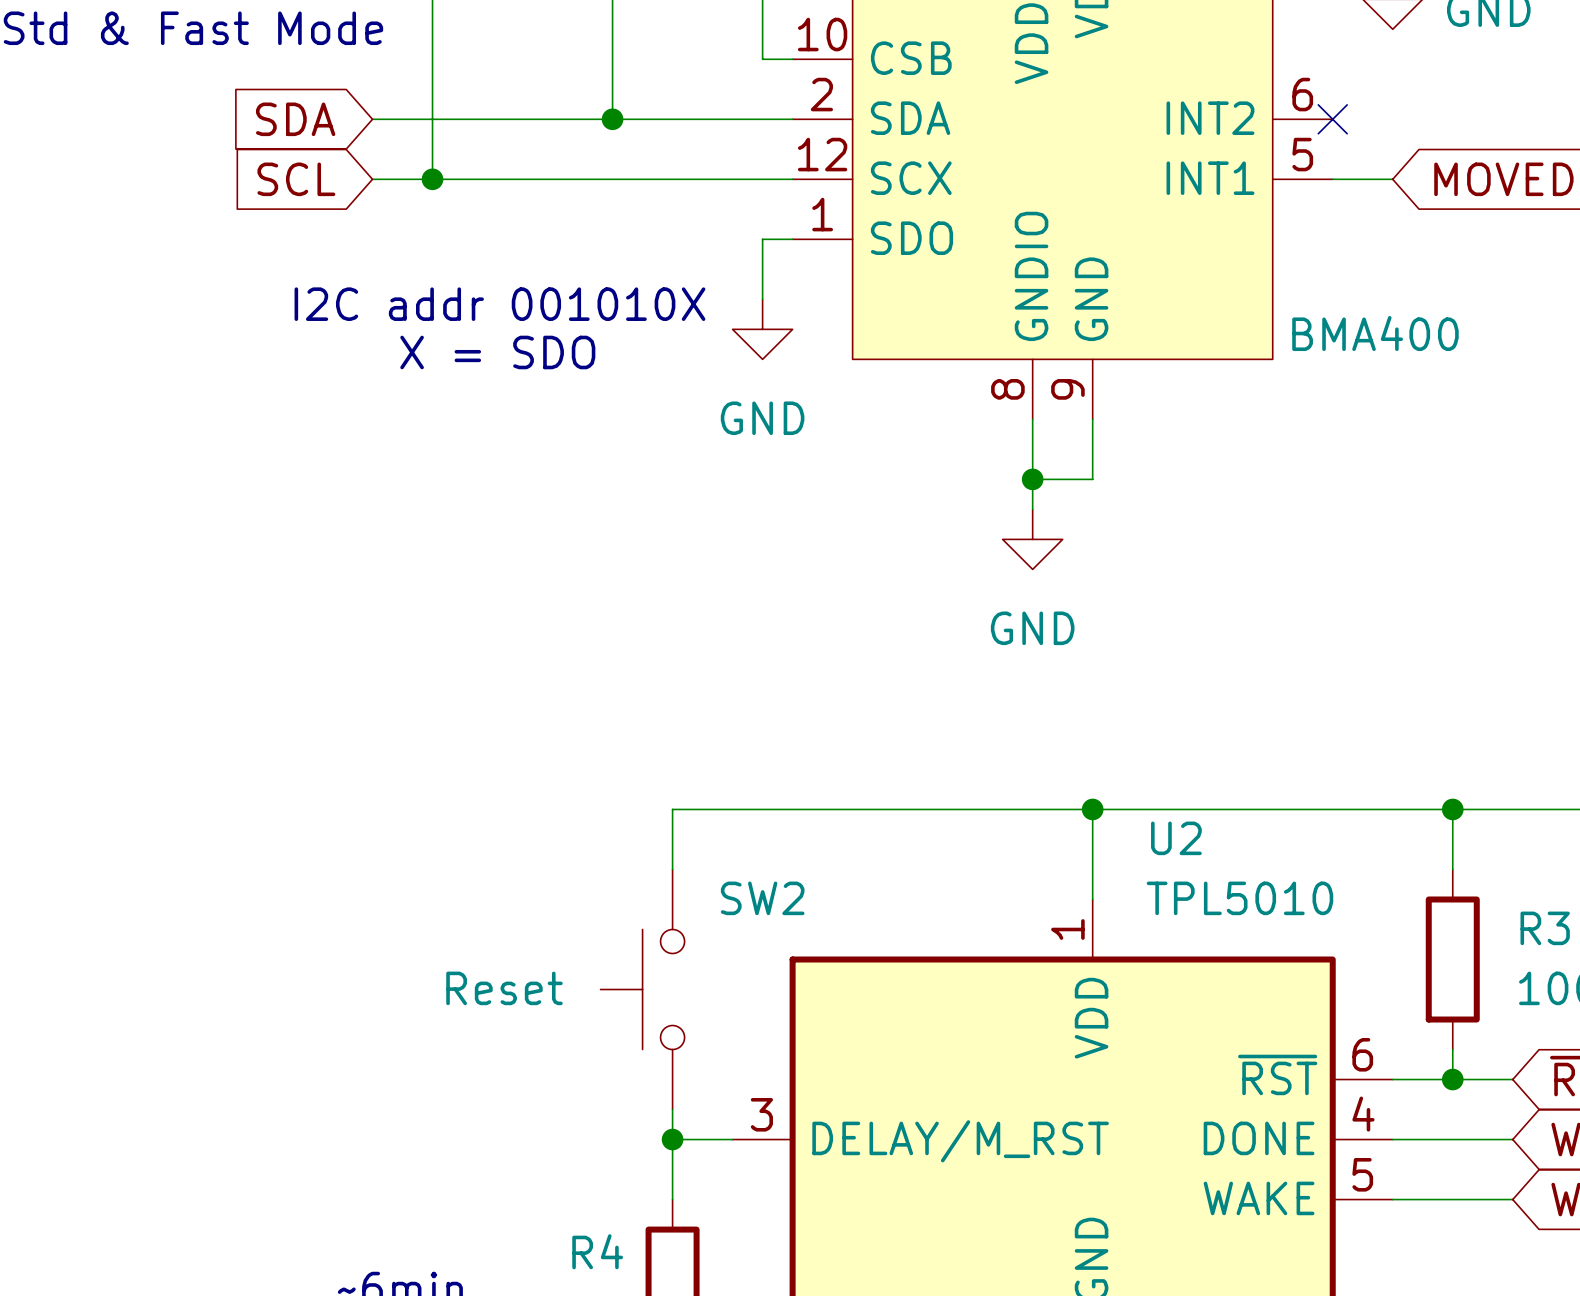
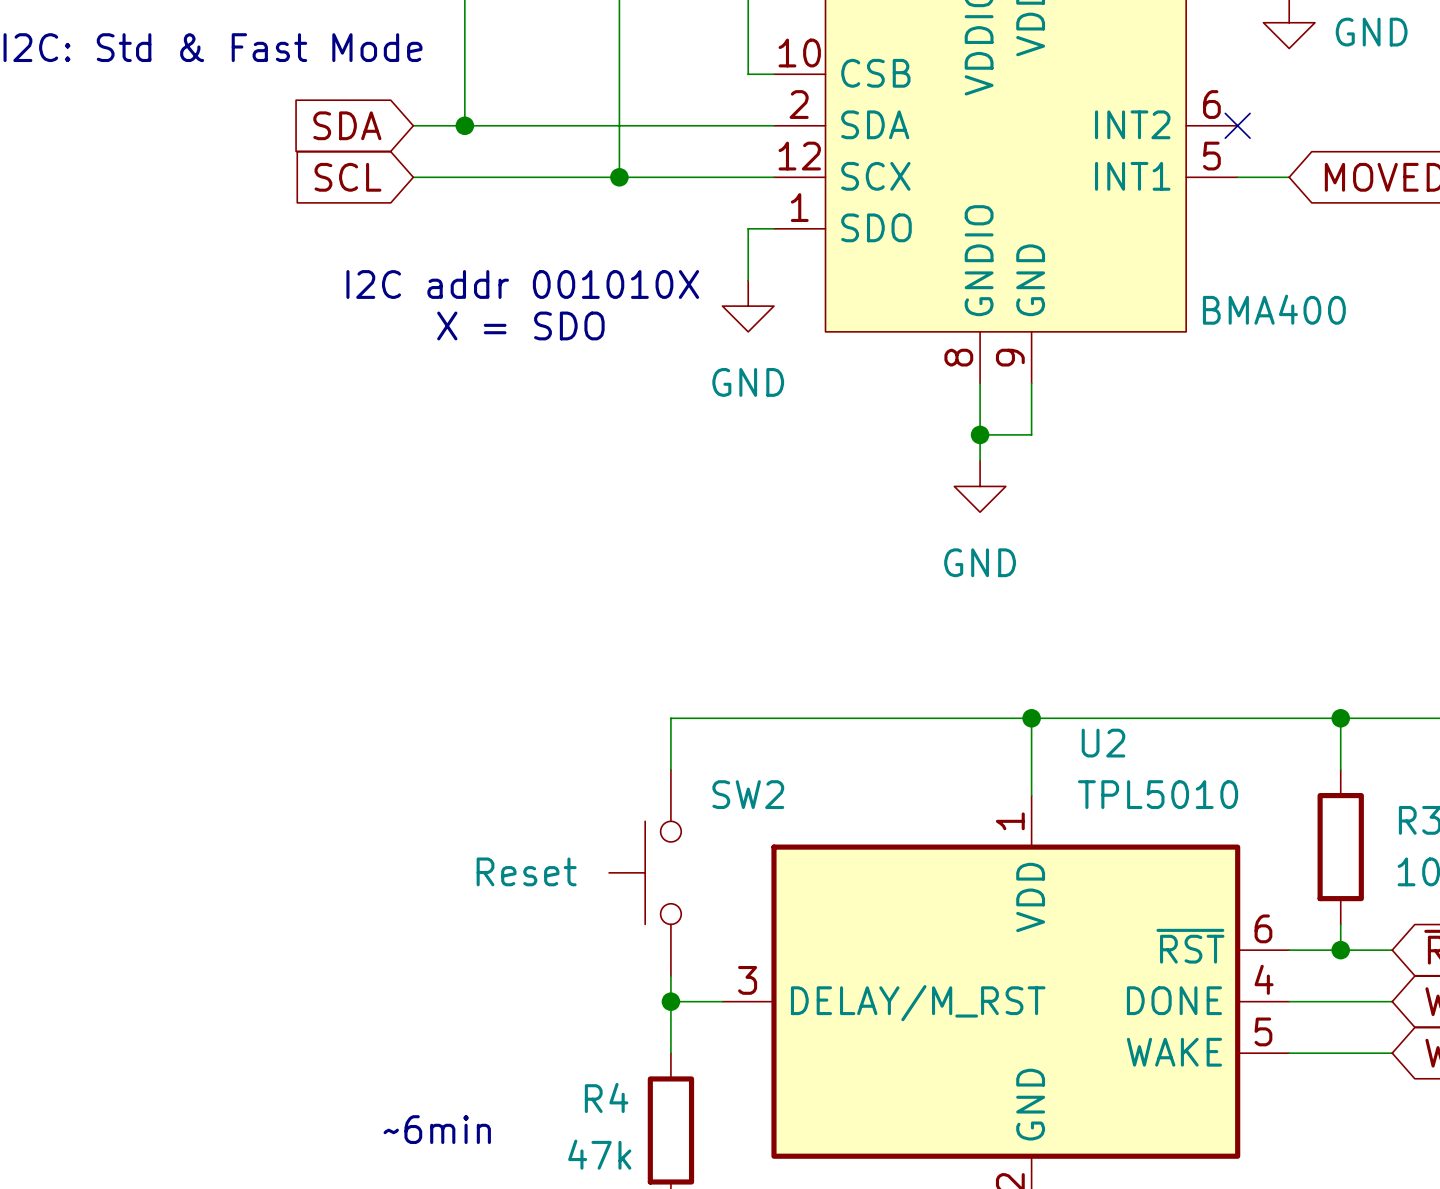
wire: (432, 119) (432, 179) -> (619, 125) (619, 177)
junction position: (612, 119) -> (619, 177)
junction position: (432, 179) -> (464, 125)

